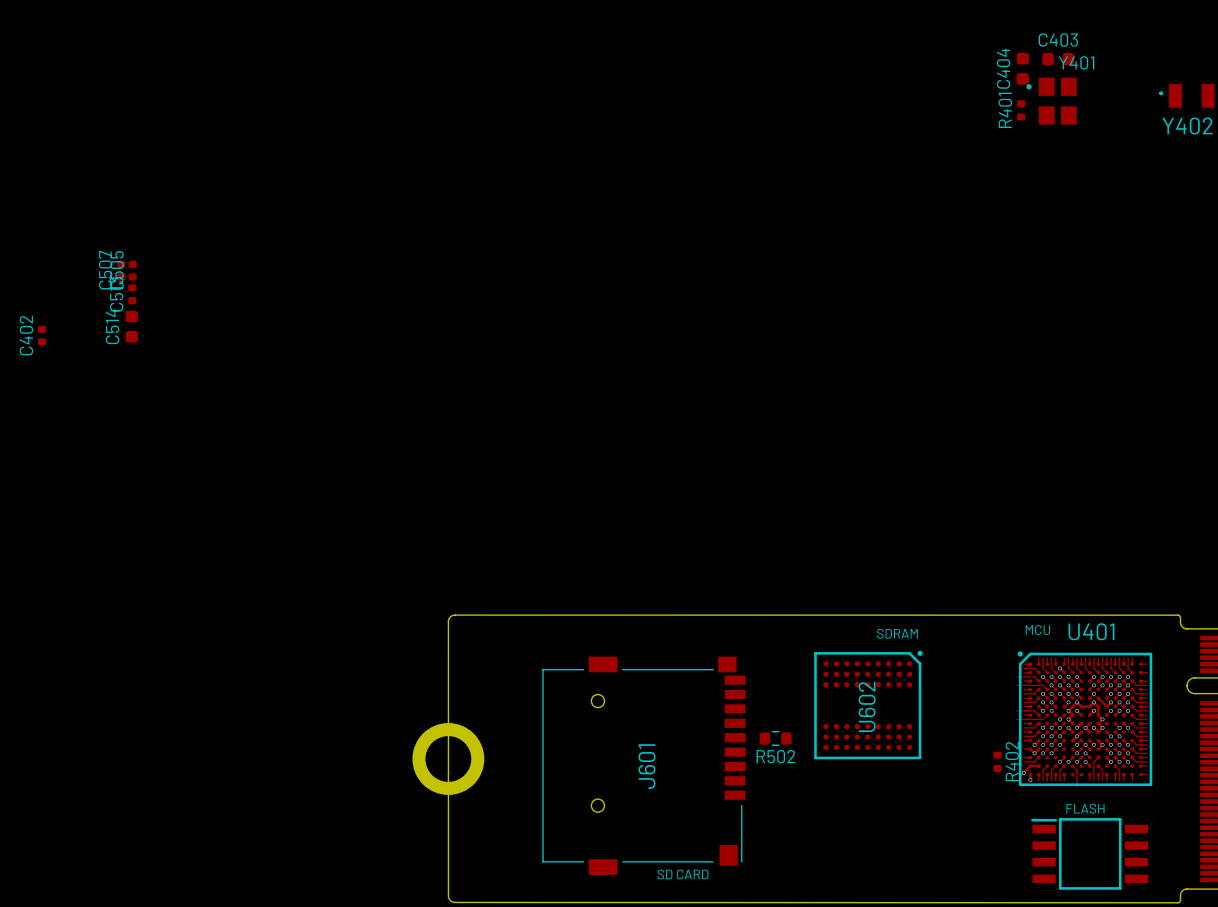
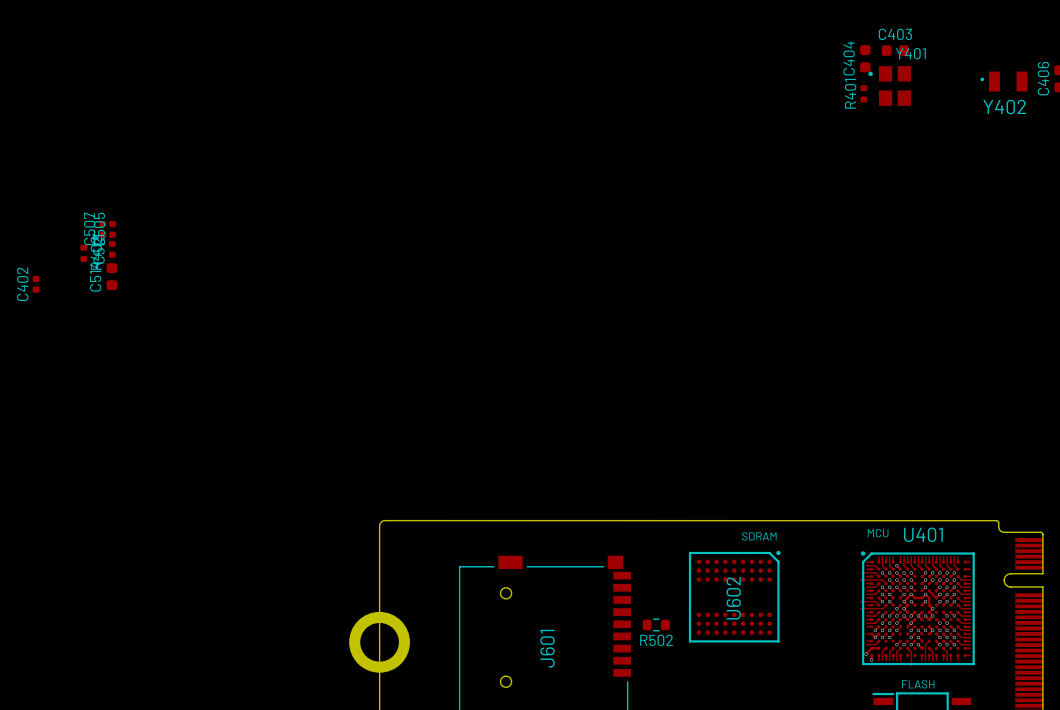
R402 position: (997, 761) -> (83, 253)

